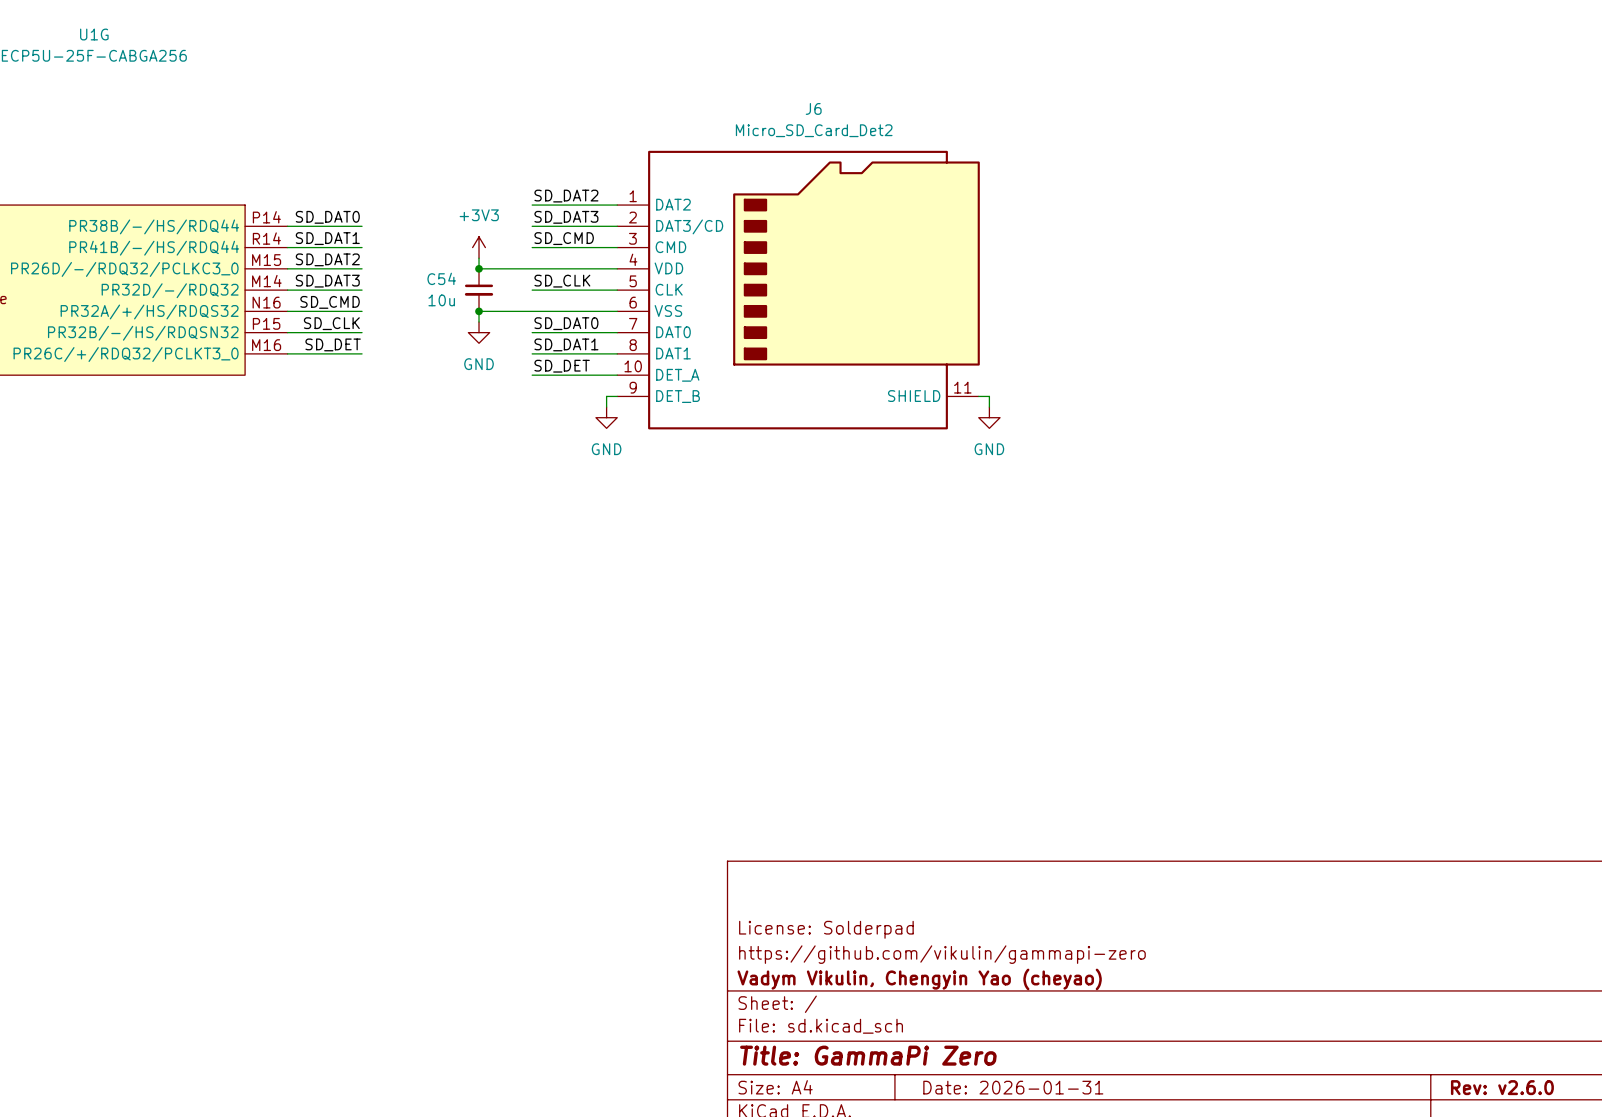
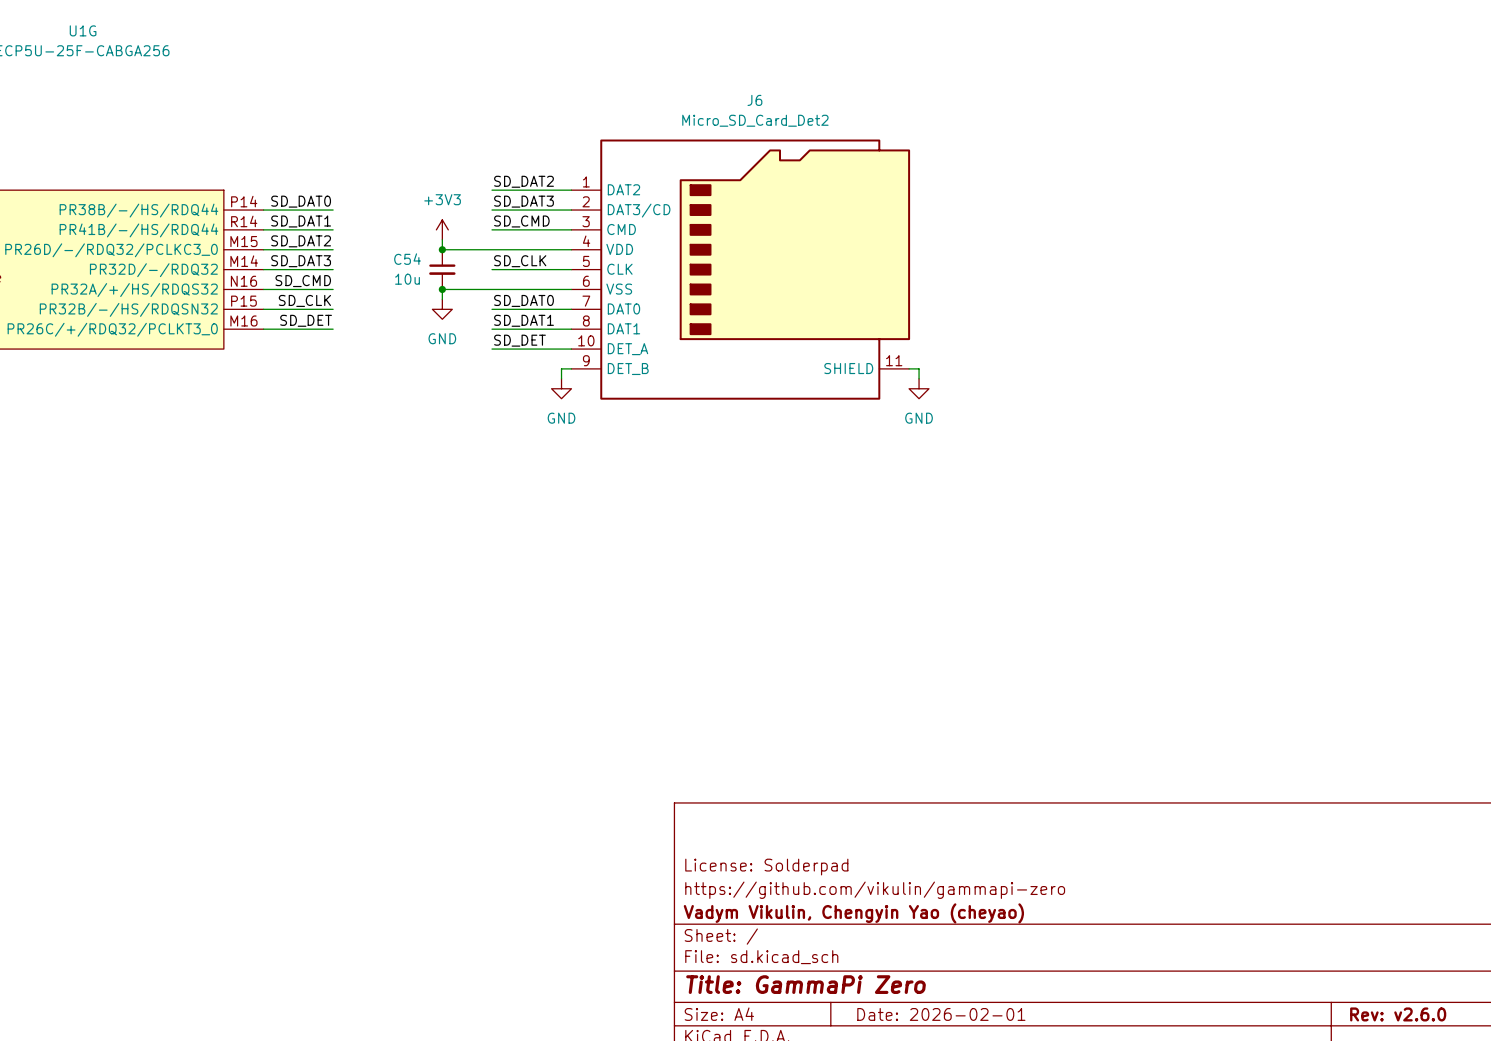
title block: Date: 2026-01-31 (1013, 1087) -> Date: 2026-02-01 (941, 1014)

